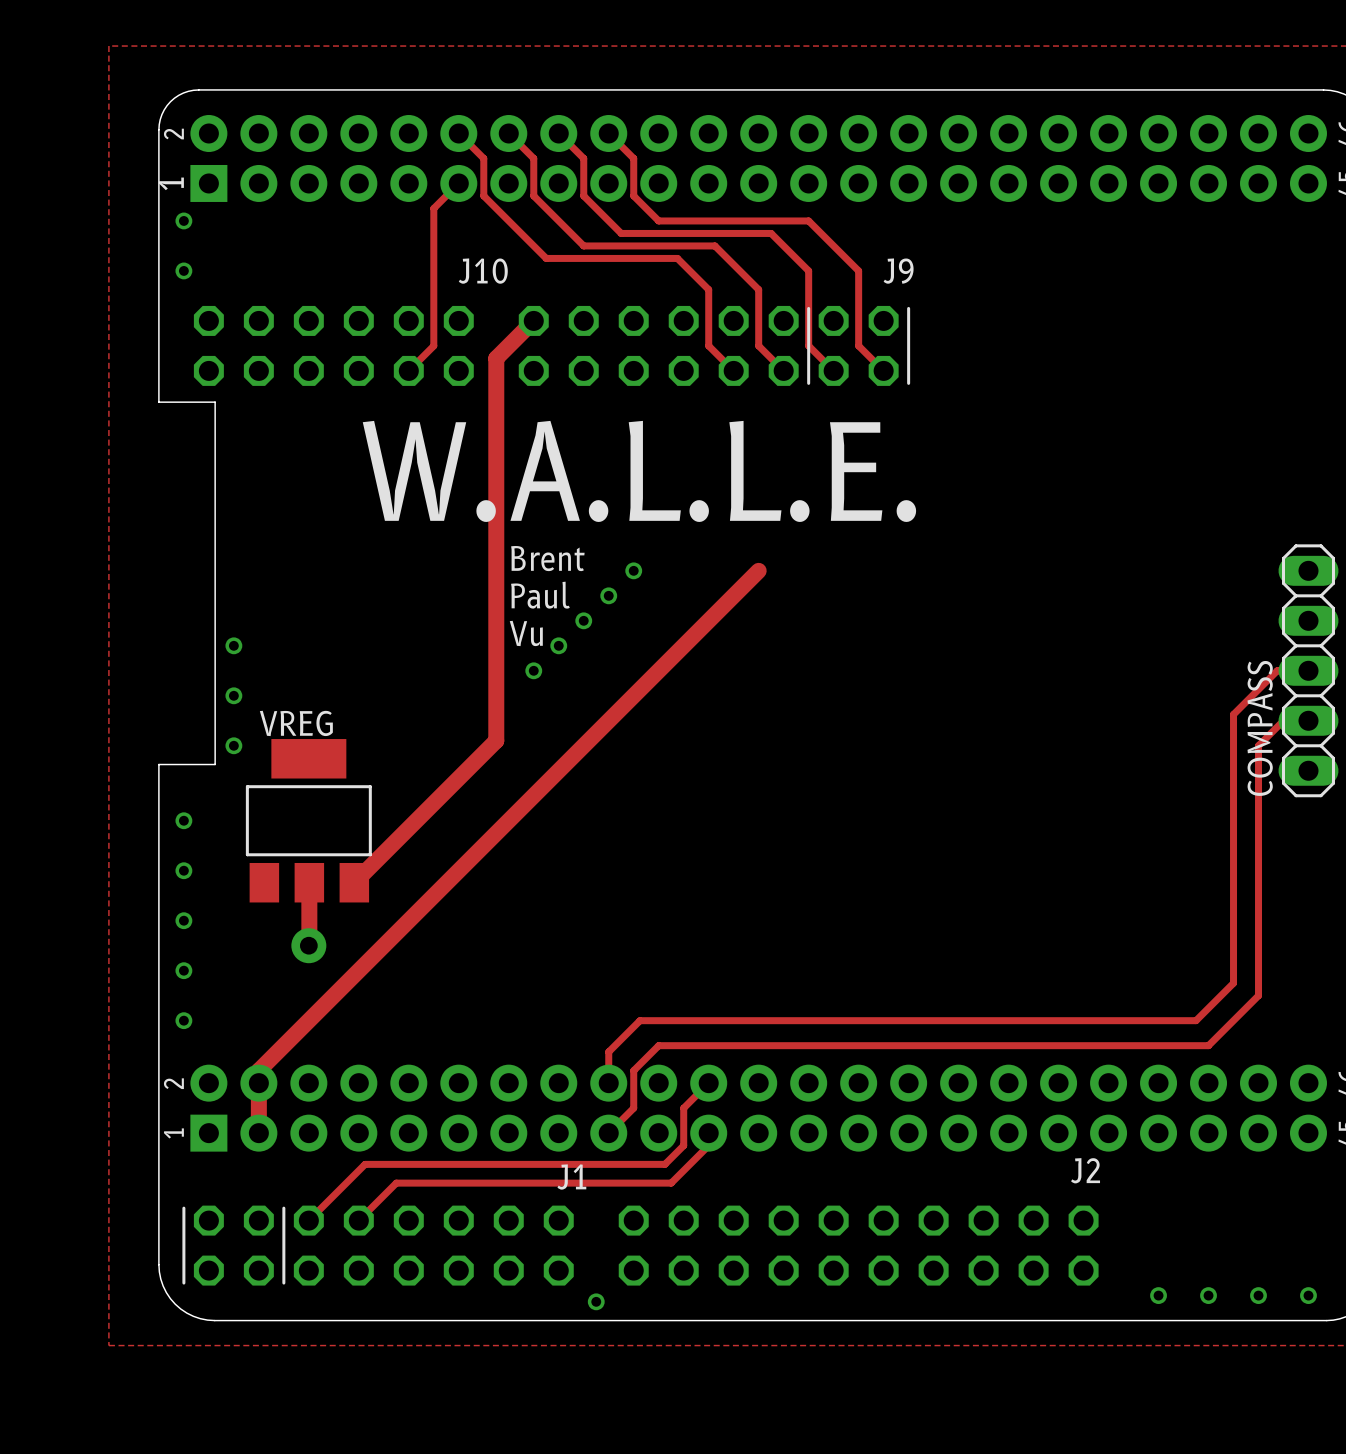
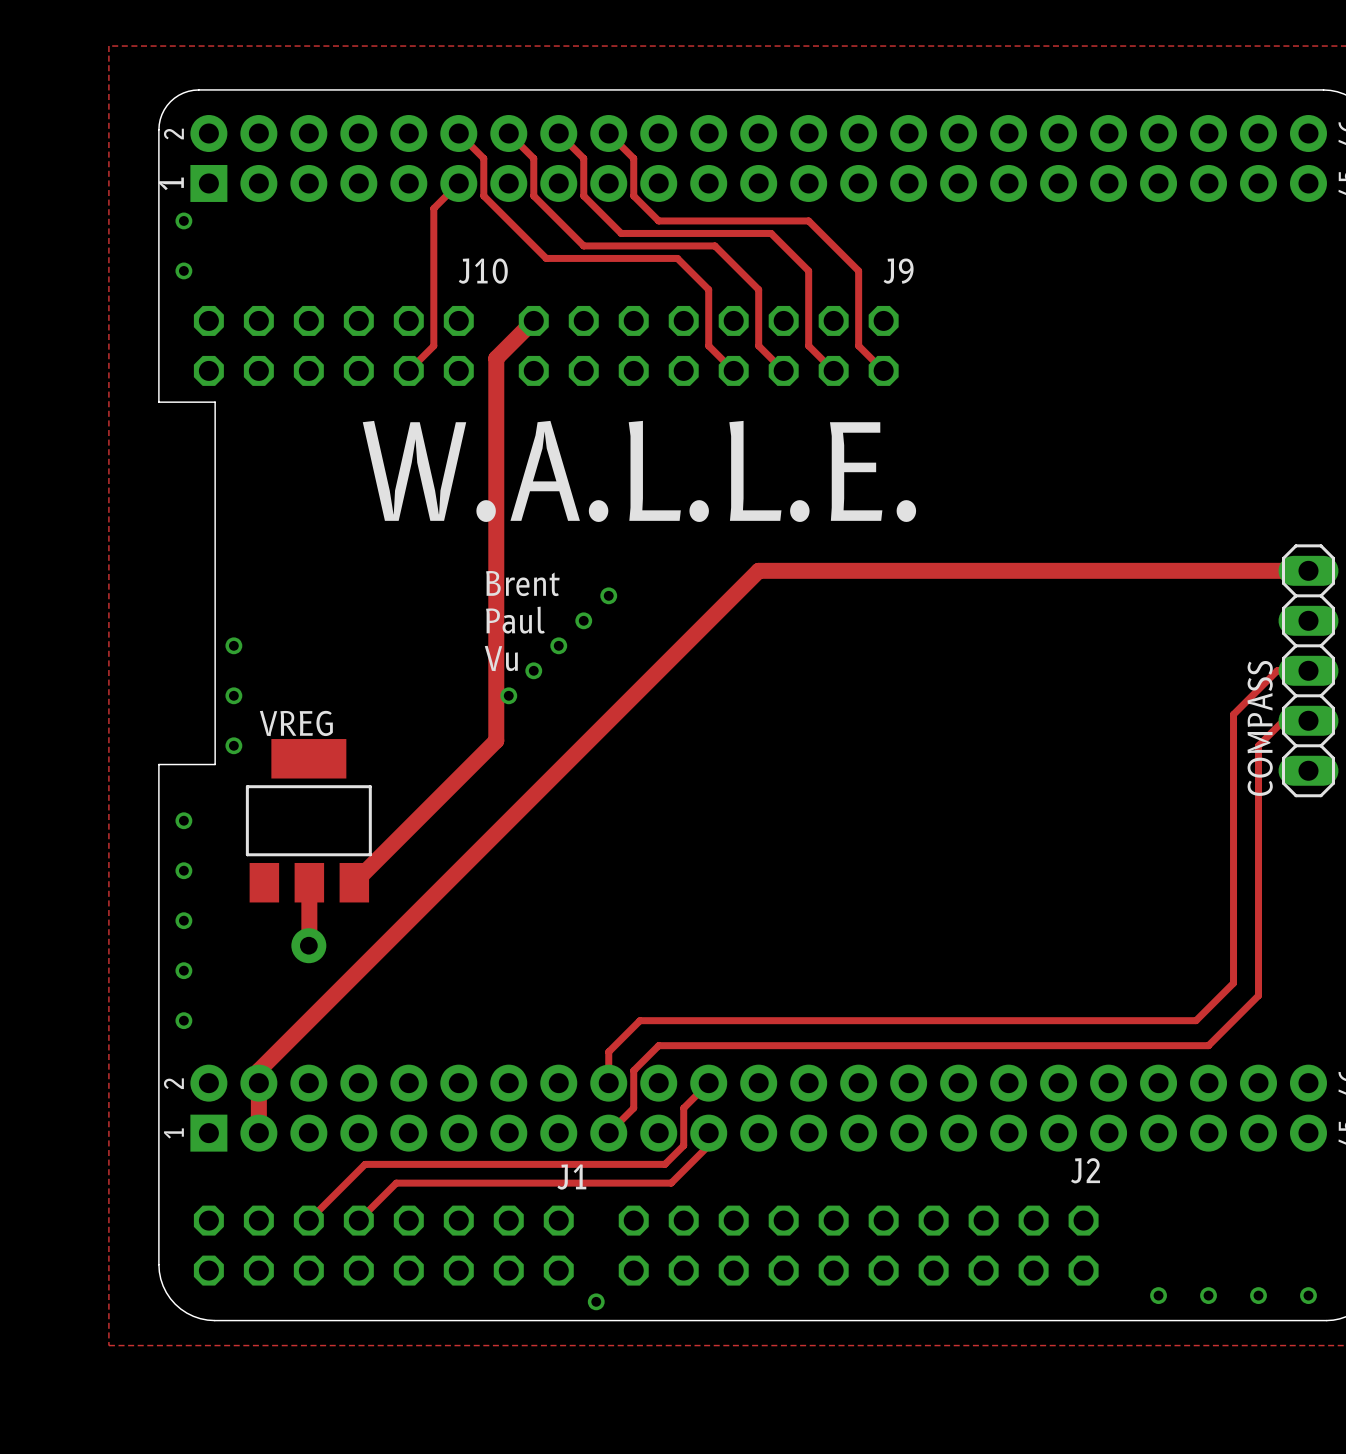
J9 footprint: [518, 305, 911, 386] -> [518, 305, 899, 386]
text position: Brent (547, 558) -> Brent (522, 583)
via: (633, 570) -> none
track: none -> (758, 570) (1308, 570)
text position: Paul (540, 595) -> Paul (515, 620)
text position: Vu (526, 633) -> Vu (501, 658)
via: none -> (508, 695)
J1 footprint: [182, 1205, 574, 1286] -> [193, 1205, 574, 1286]

